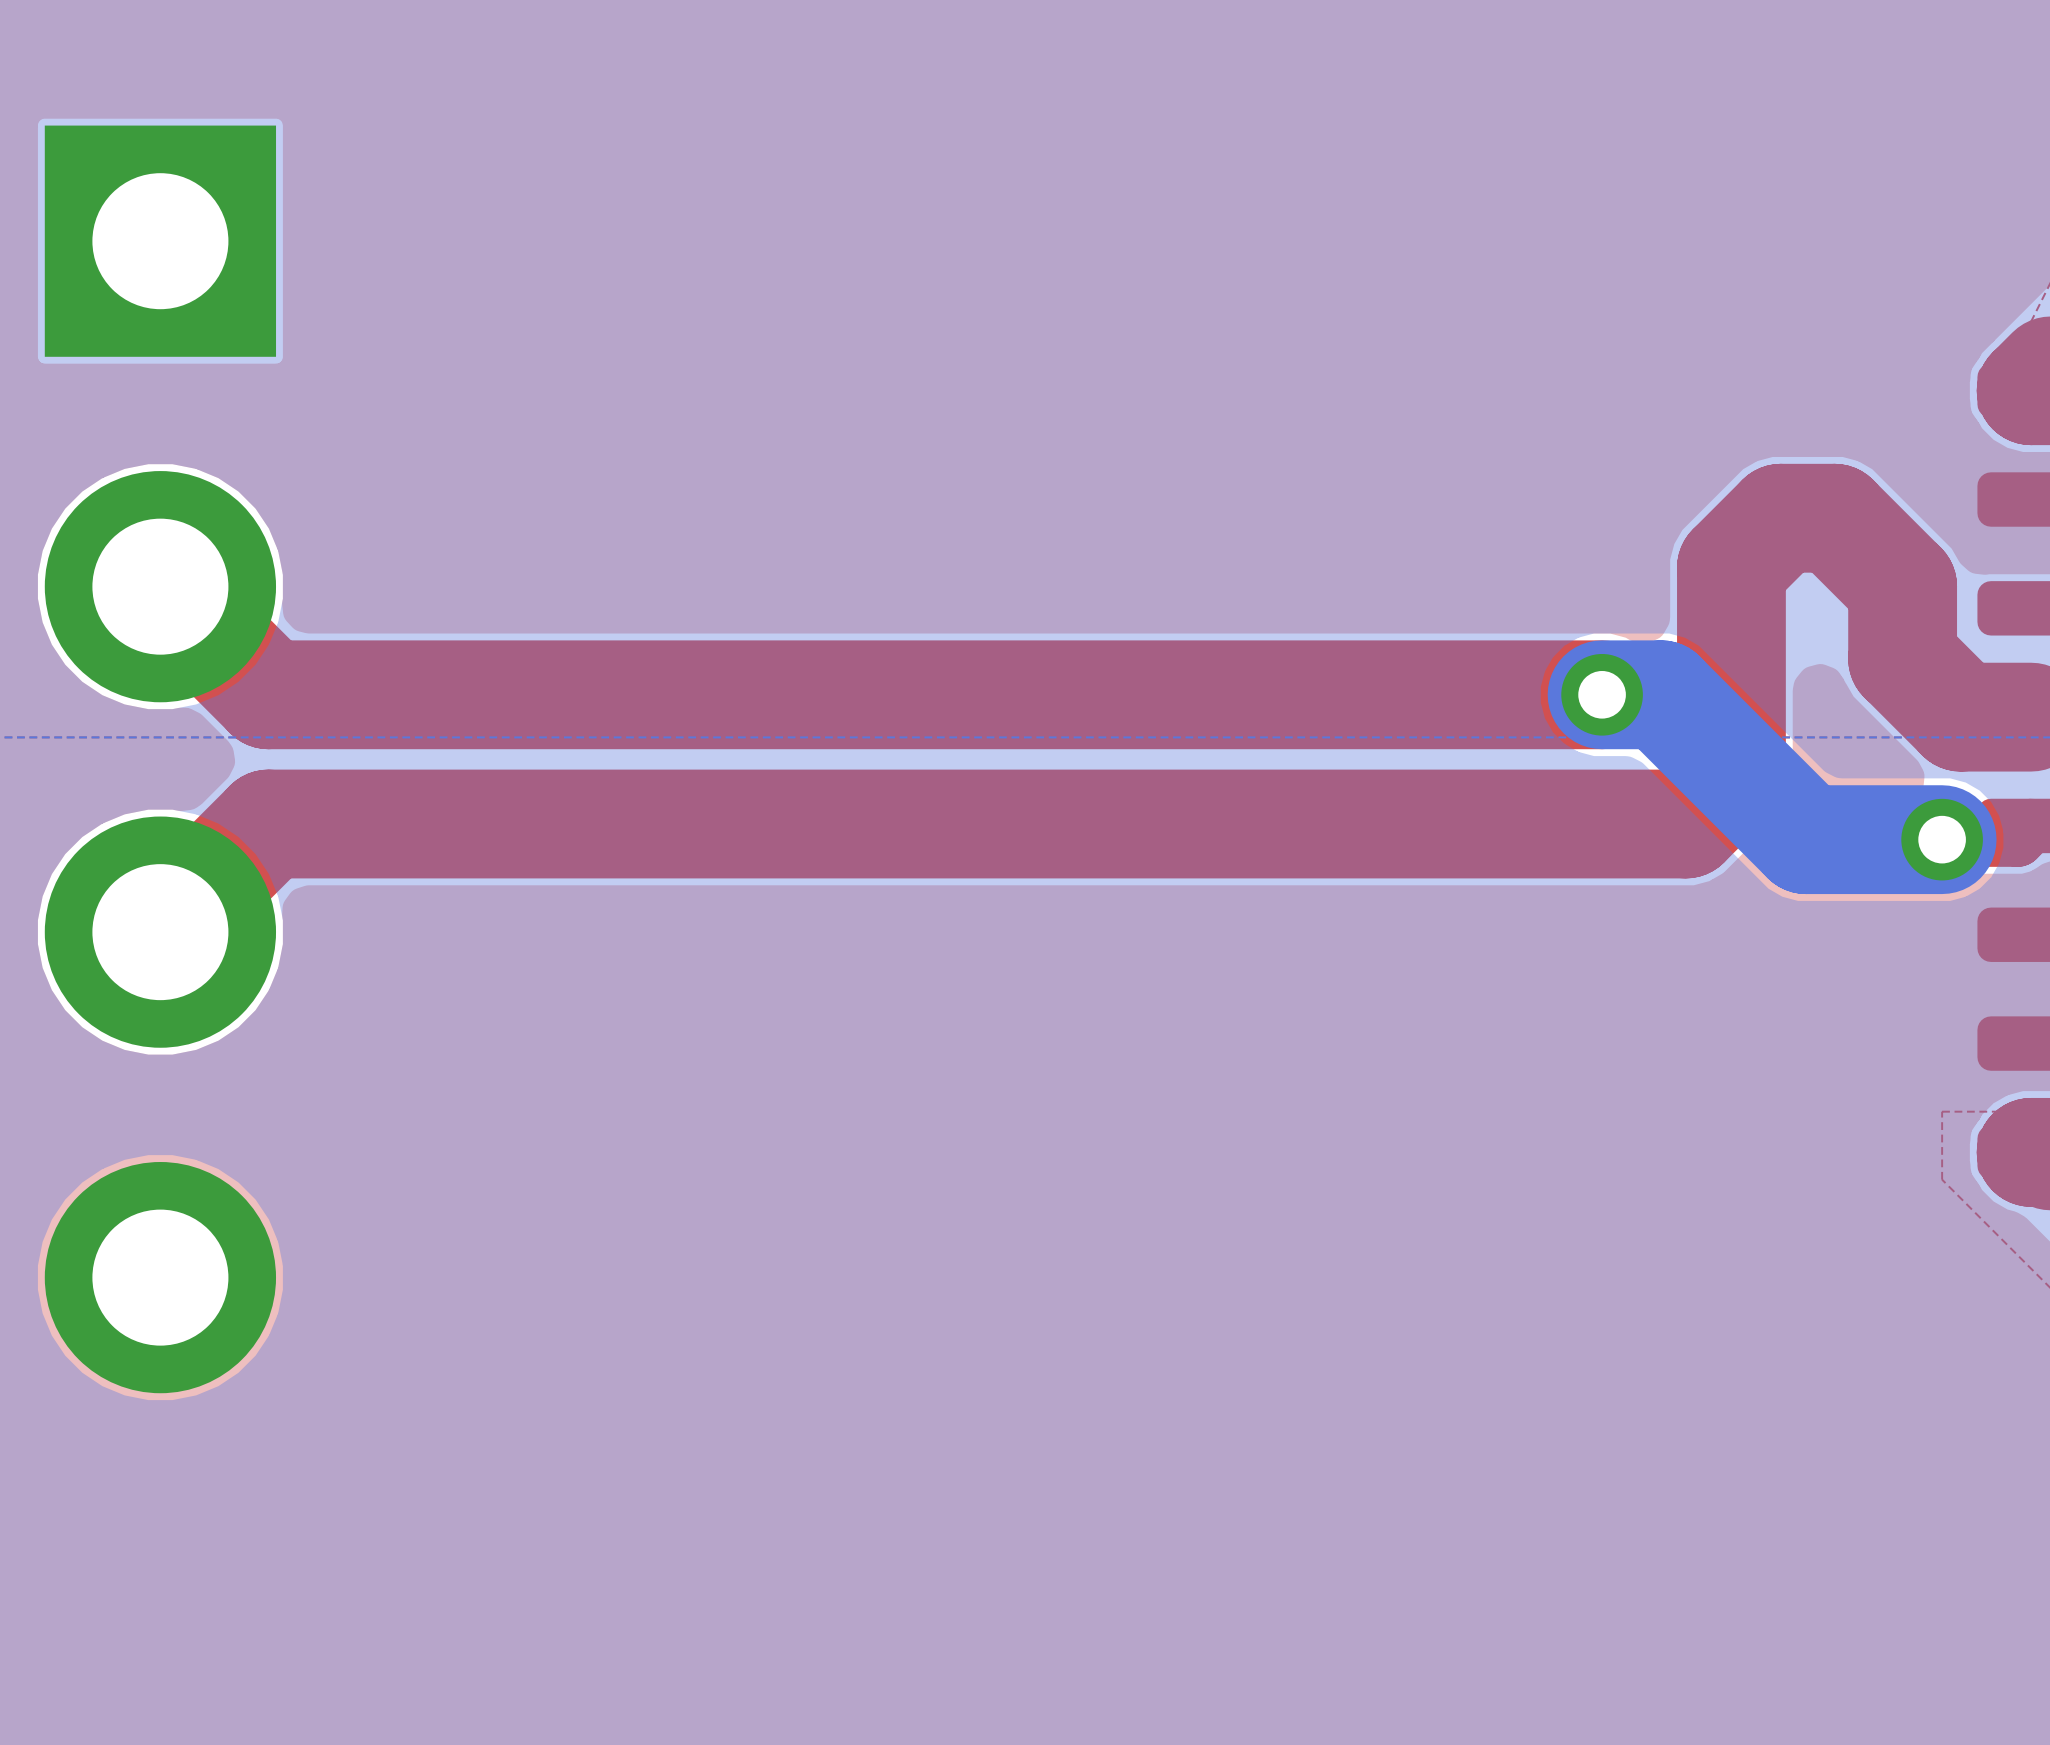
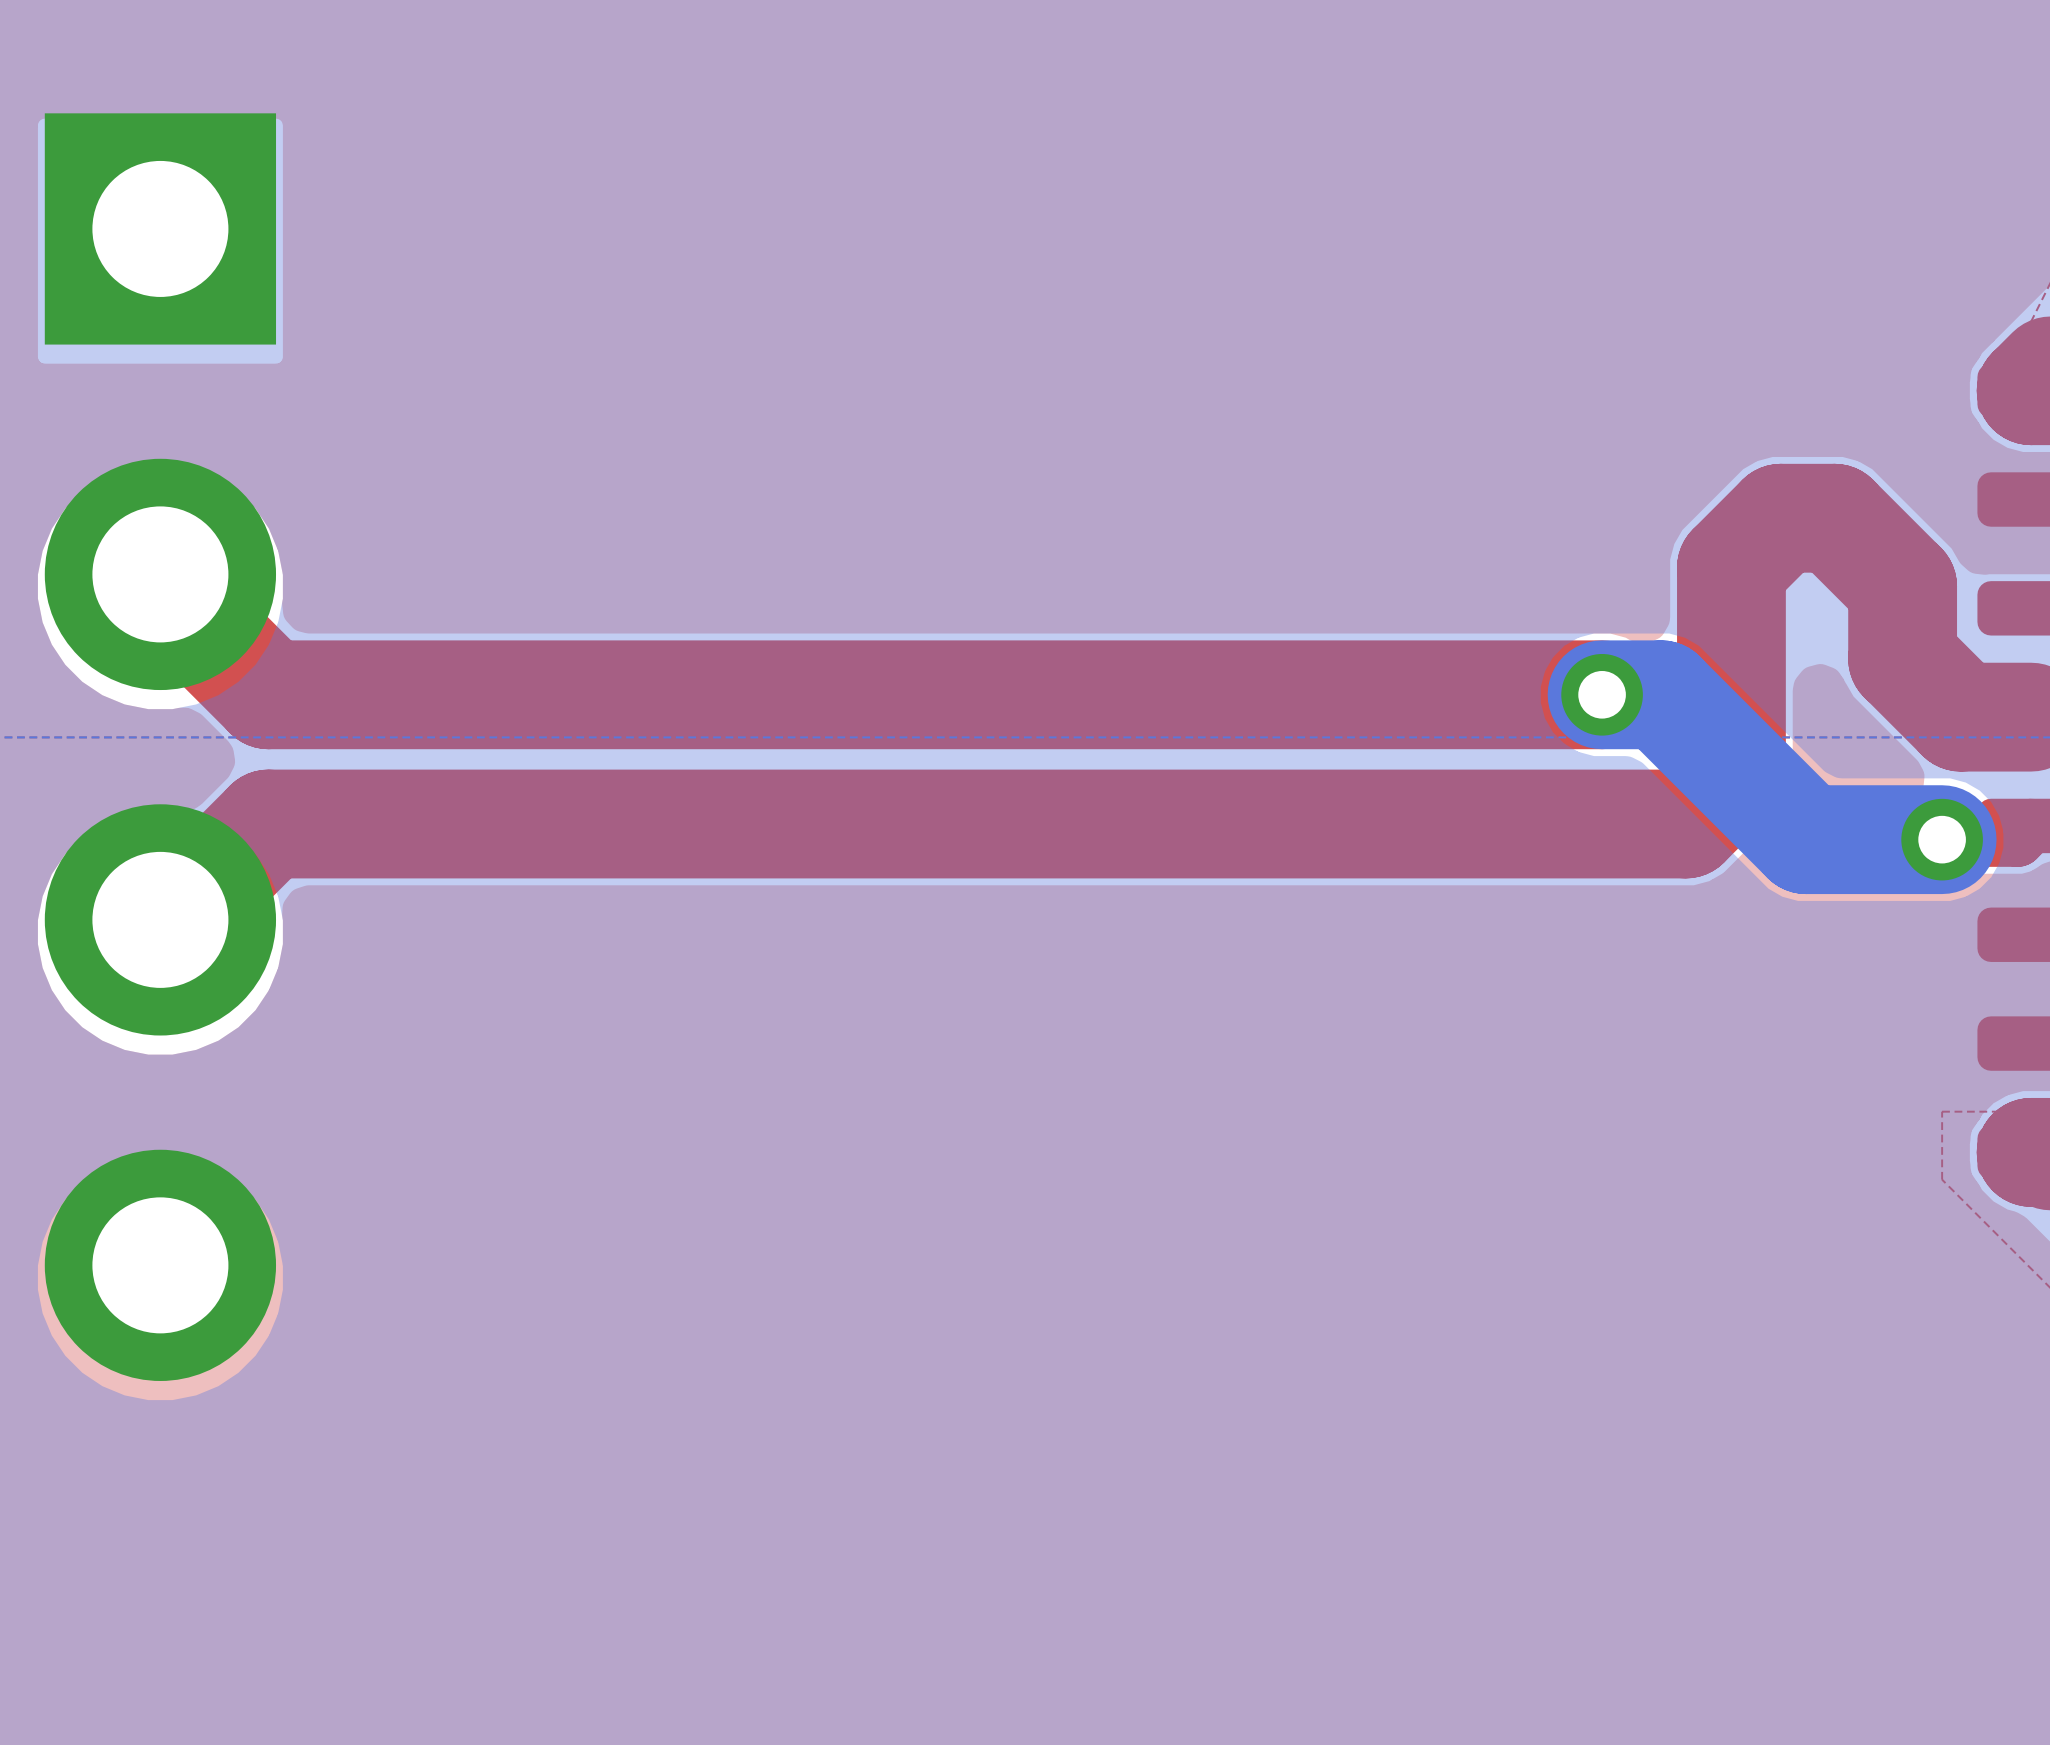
part position: (160, 759) -> (160, 747)

